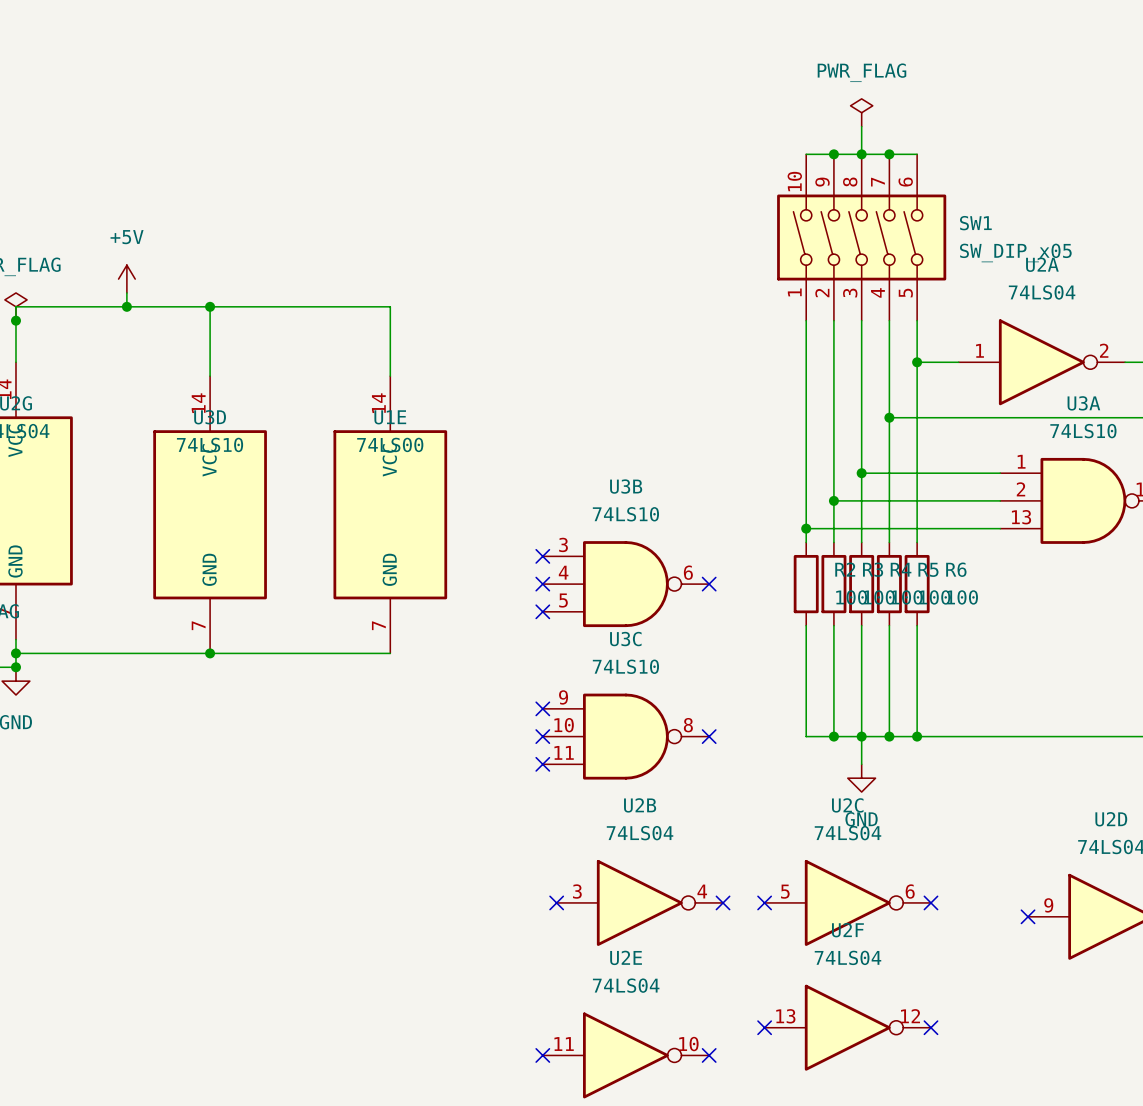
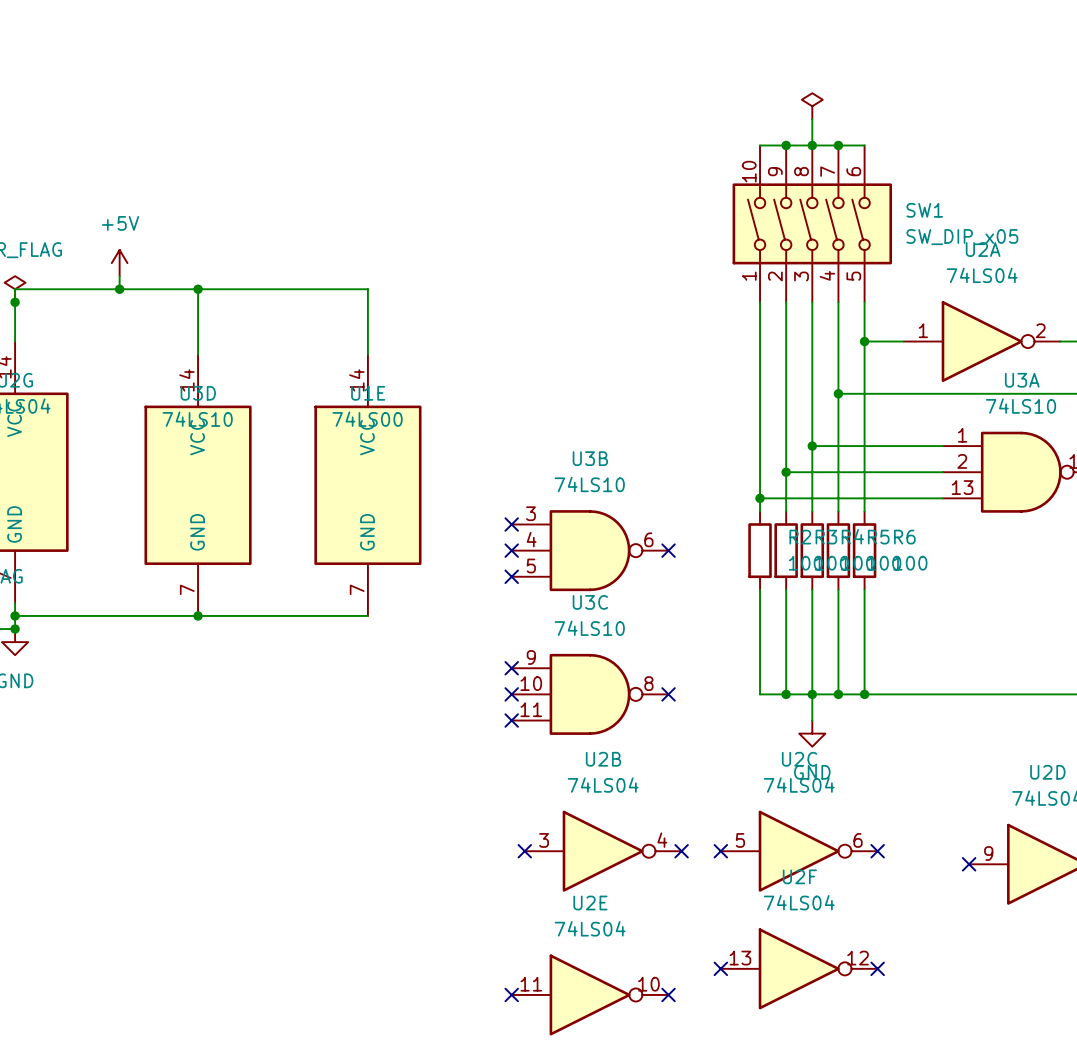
power symbol text: PWR_FLAG (861, 72) -> none

